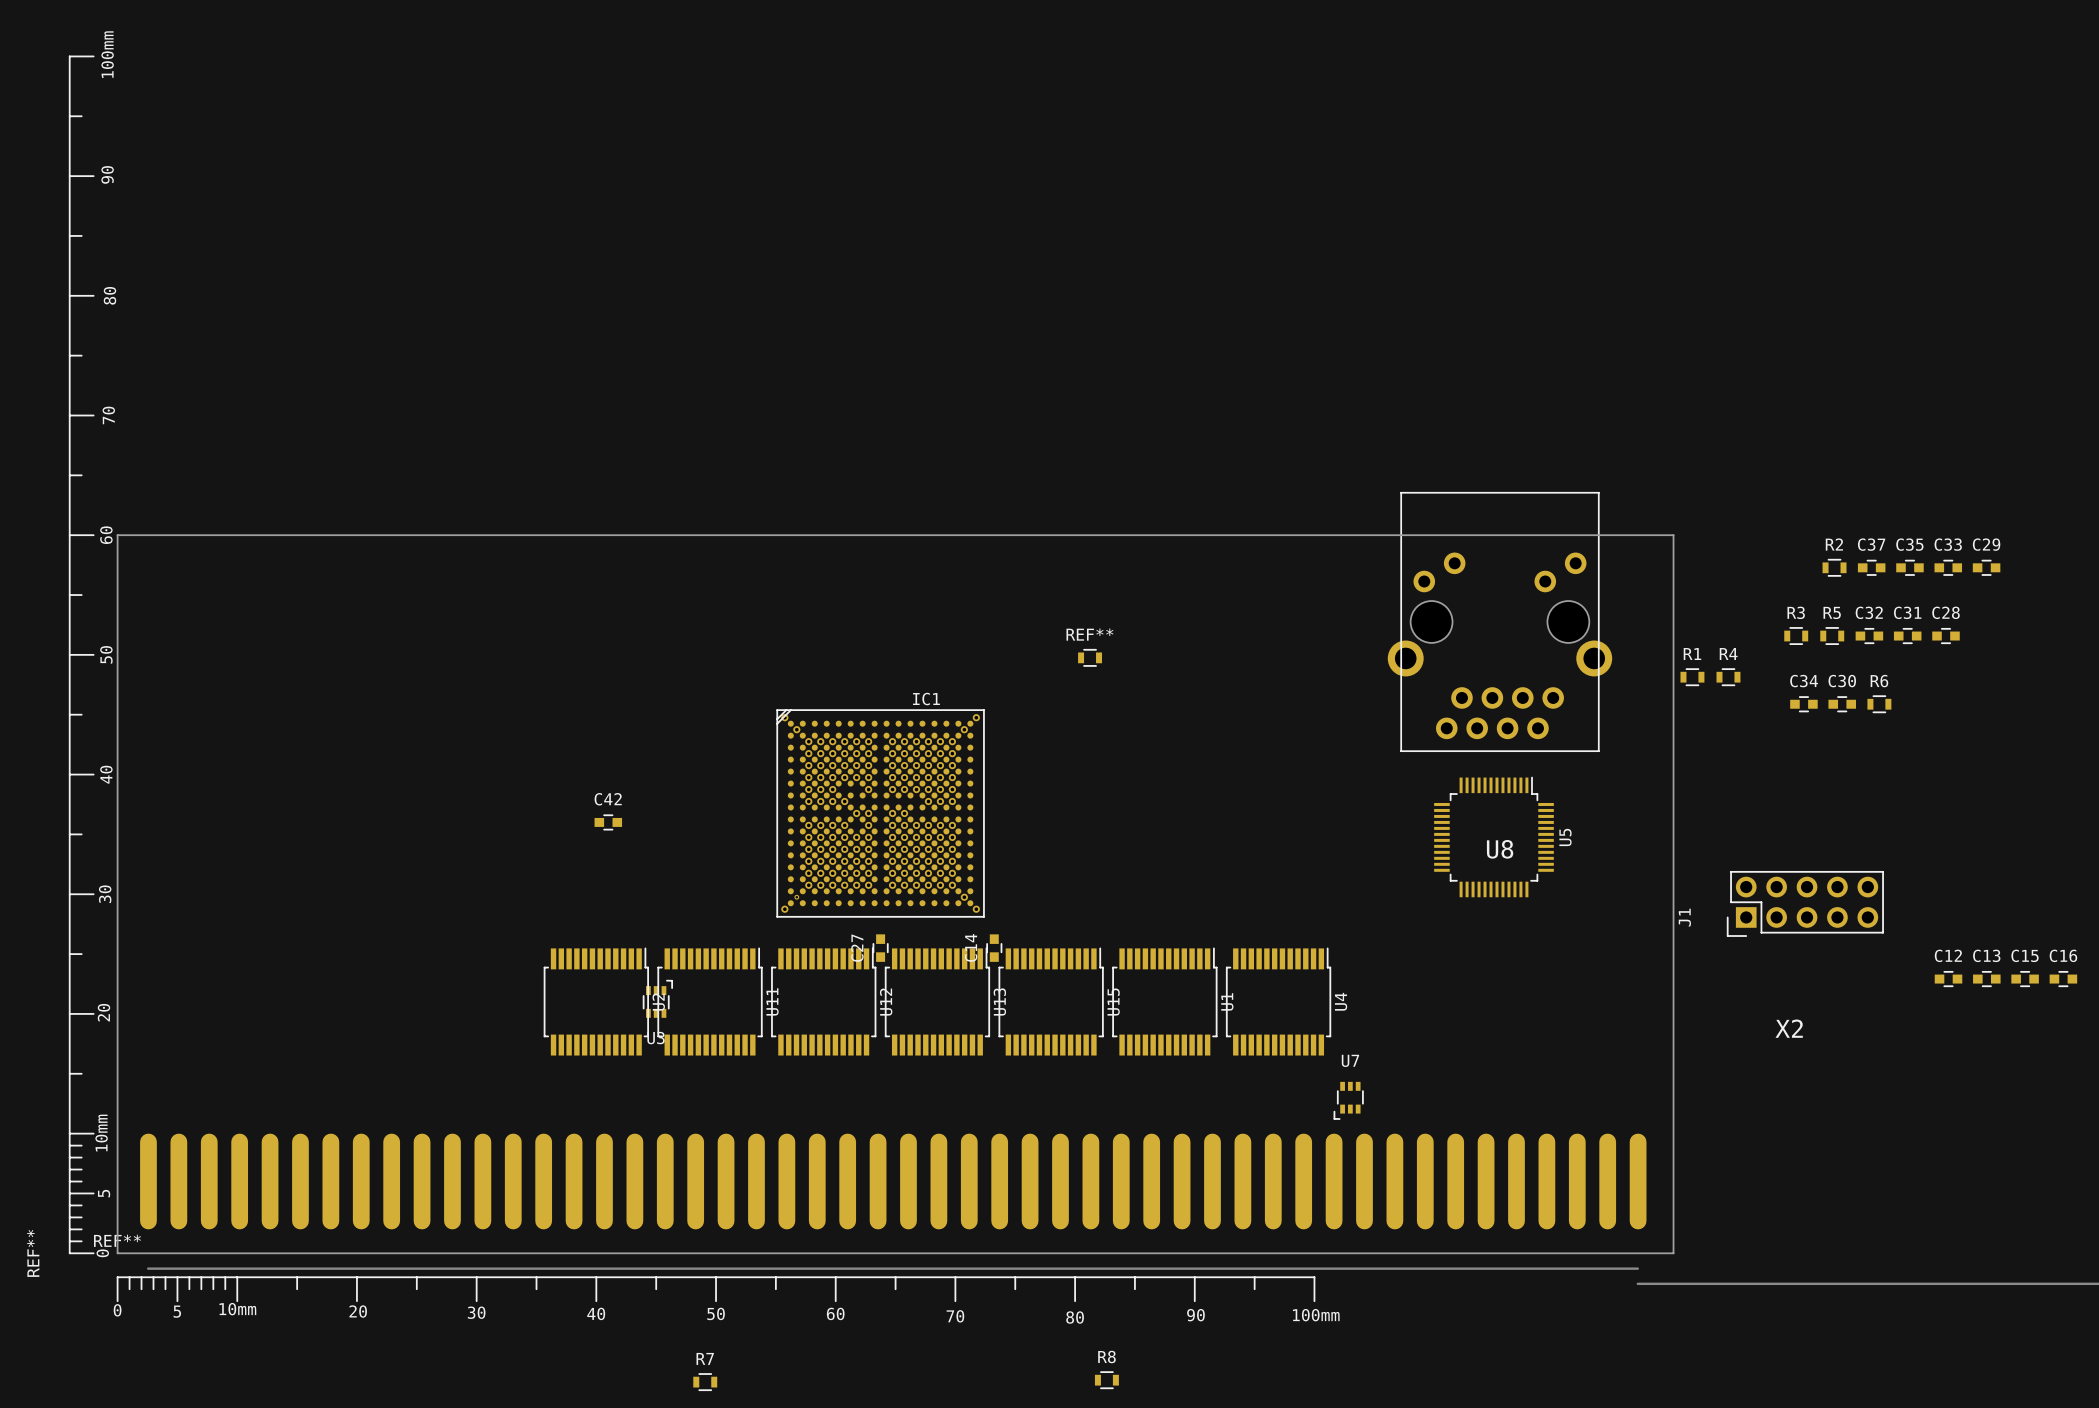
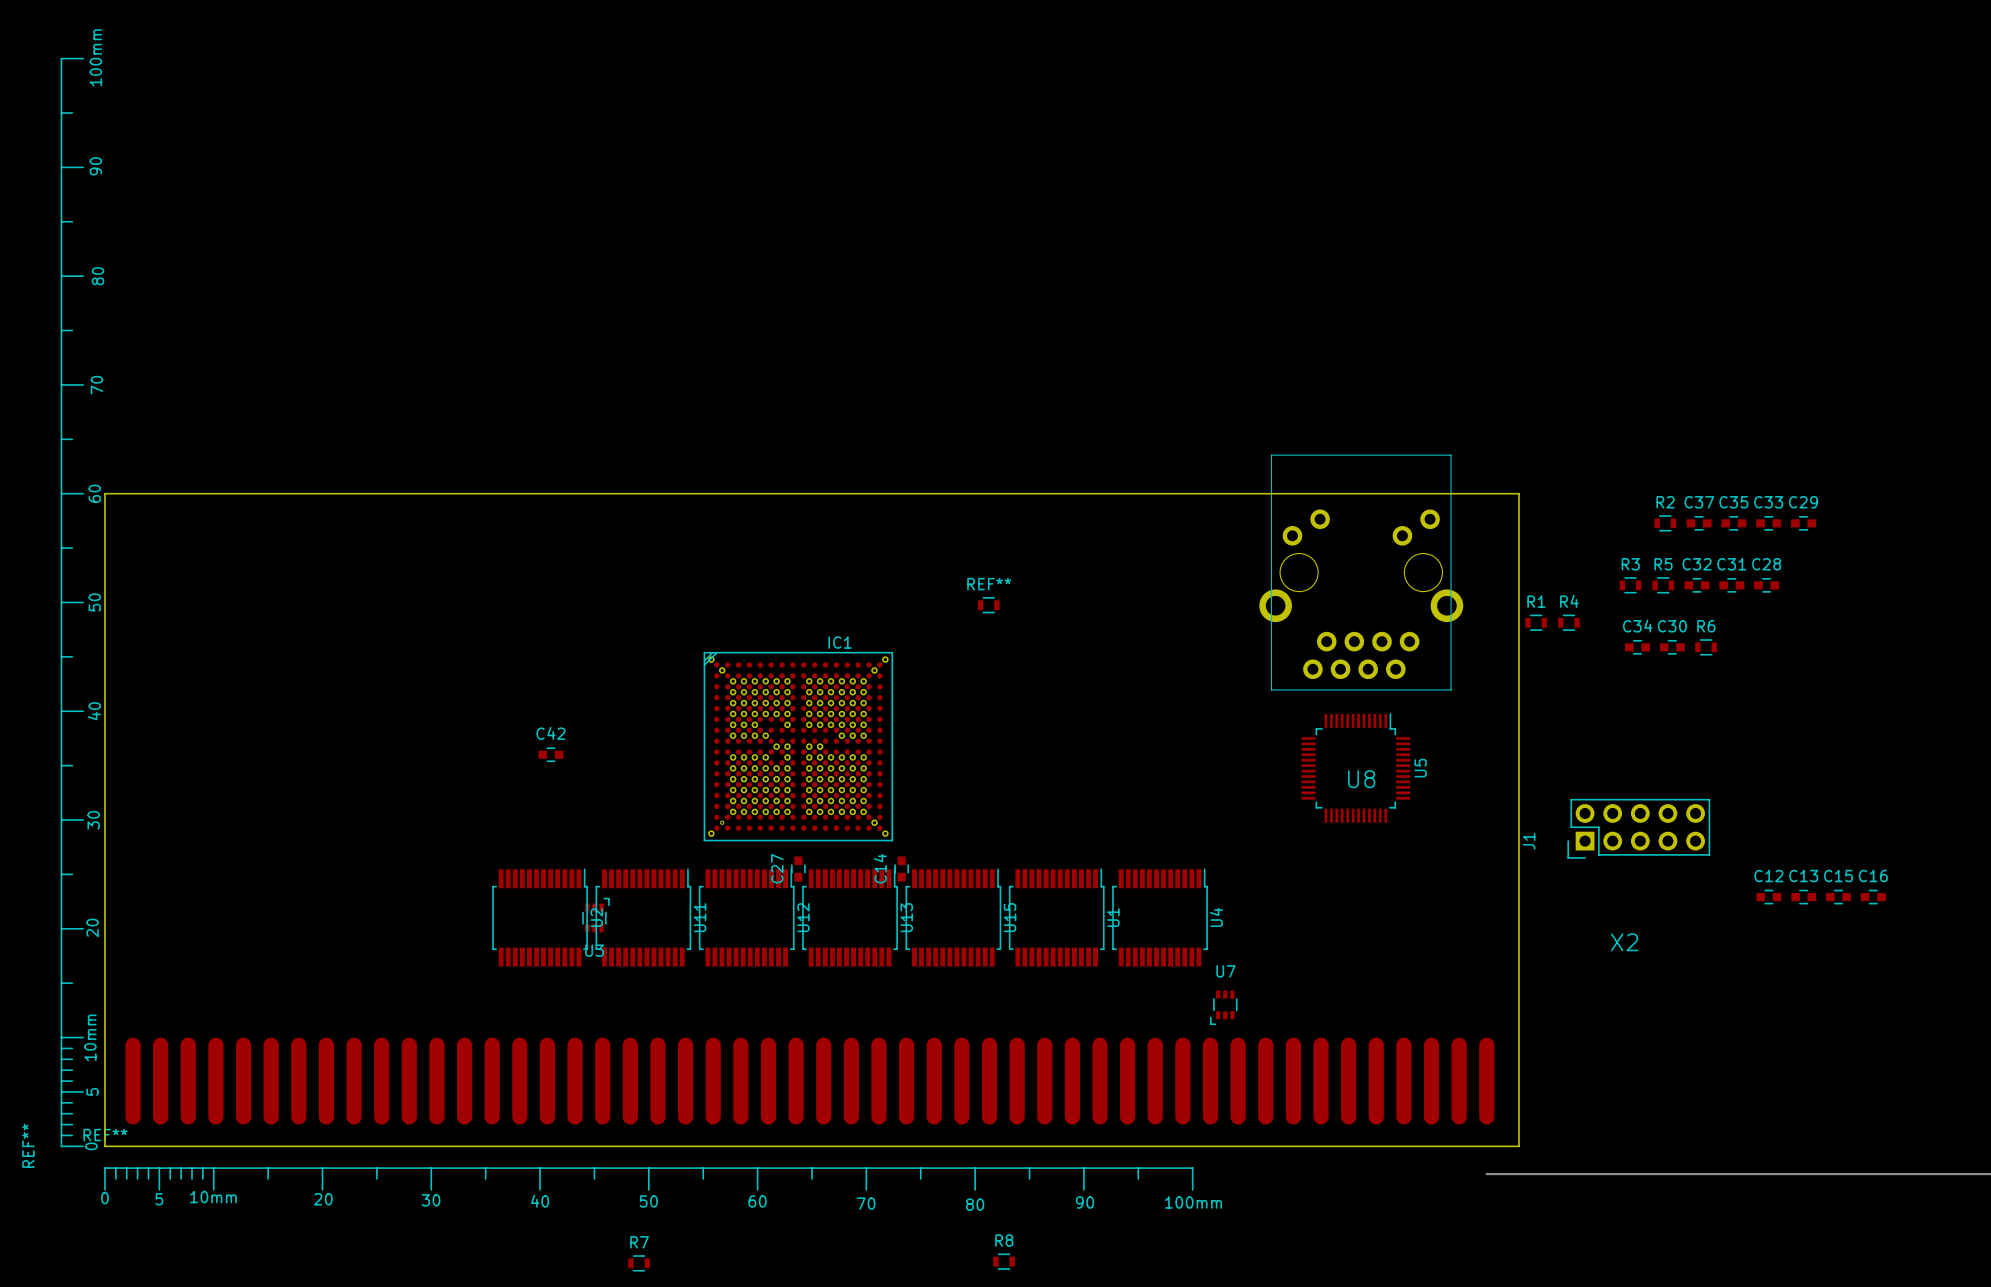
line: (148, 1268) (1637, 1268) -> none

